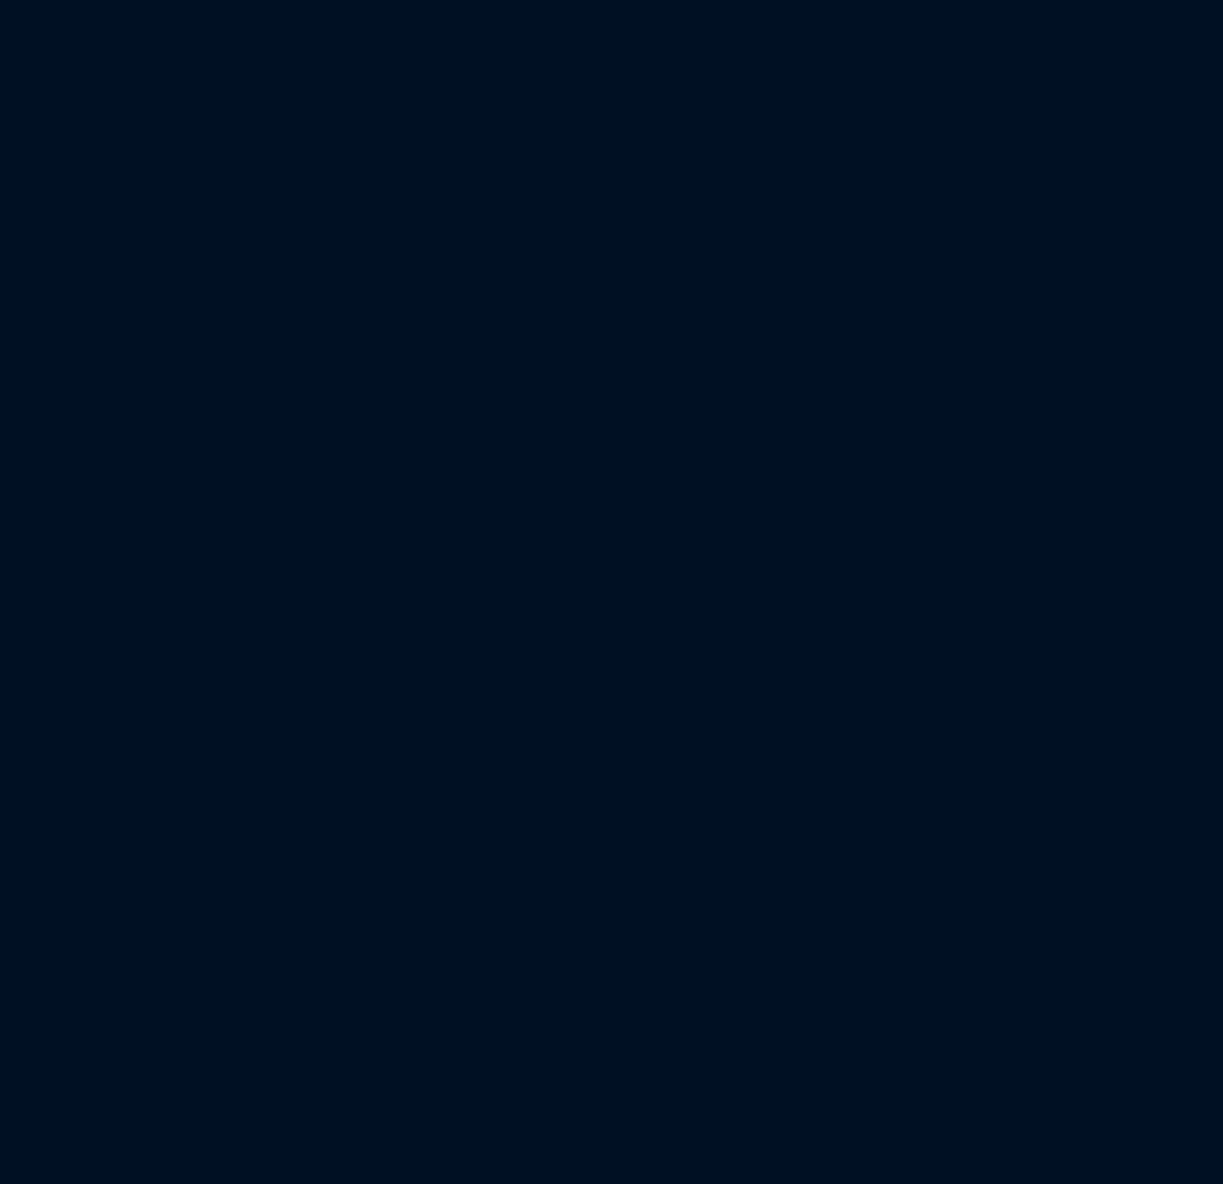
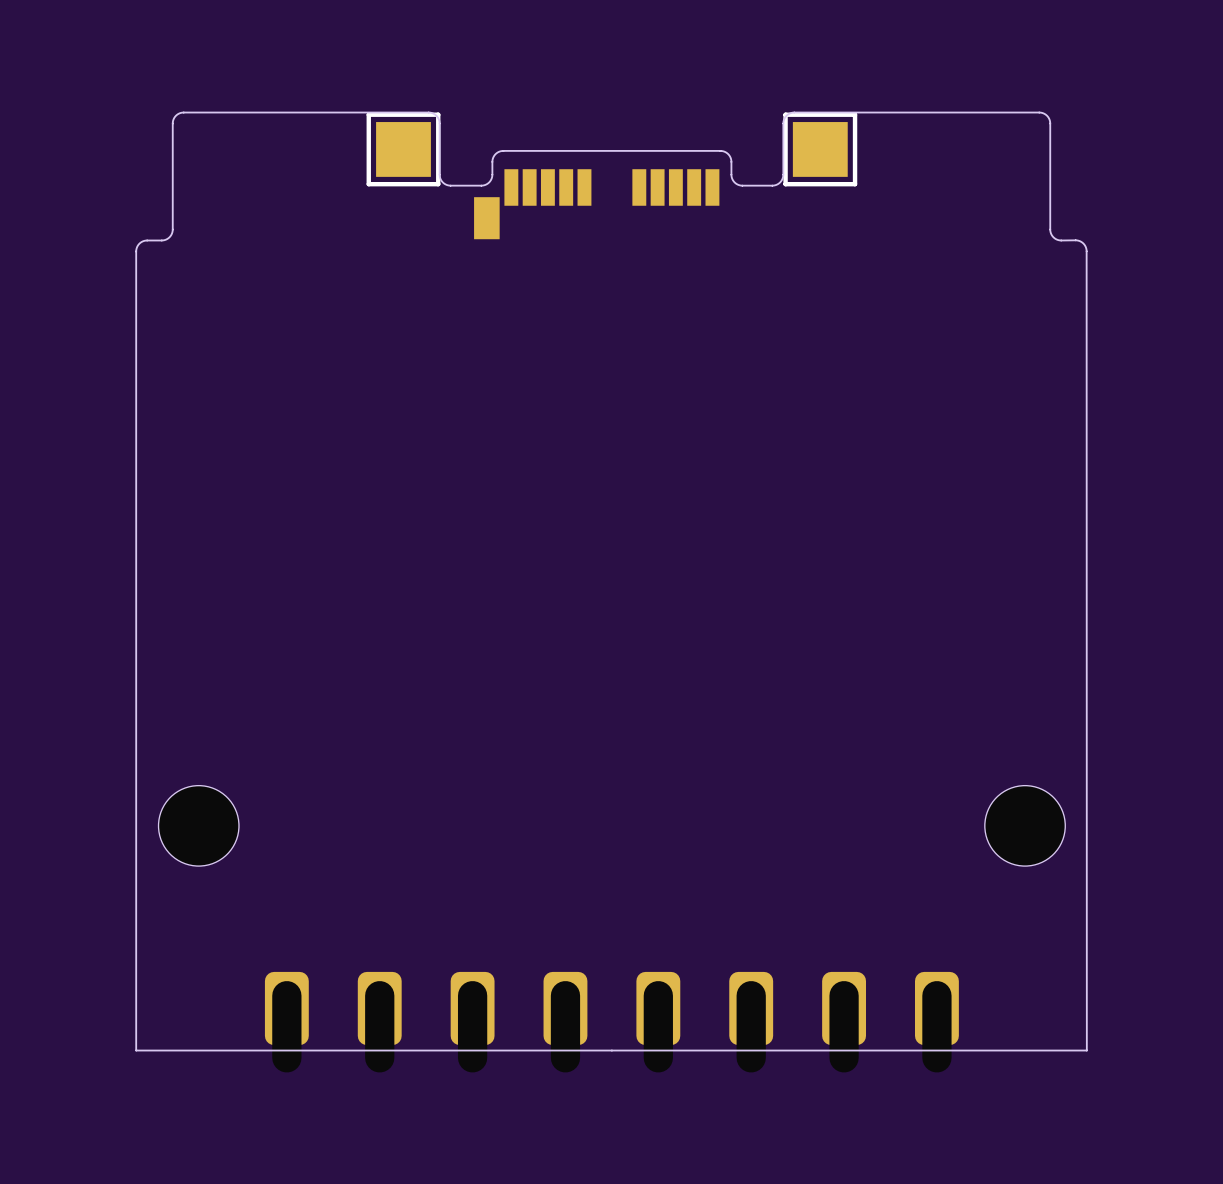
part: none -> (403, 149)
part: none -> (820, 149)
part: none -> (596, 204)
part: none -> (198, 825)
part: none -> (1025, 825)
part: none -> (611, 1022)
board edge: none -> (1086, 1050) (1086, 251) (1081, 241) (1058, 240) (1051, 233) (1050, 122) (1047, 115) (1039, 112) (791, 112) (786, 115) (783, 122) (782, 177) (779, 183) (772, 185) (742, 185) (735, 183) (731, 177) (730, 157) (725, 152) (720, 150) (501, 151) (493, 157) (492, 177) (486, 184) (449, 185) (443, 183) (440, 177) (439, 122) (437, 116) (431, 112) (183, 112) (175, 115) (172, 123) (172, 232) (164, 240) (141, 241) (136, 251) (136, 1050)

